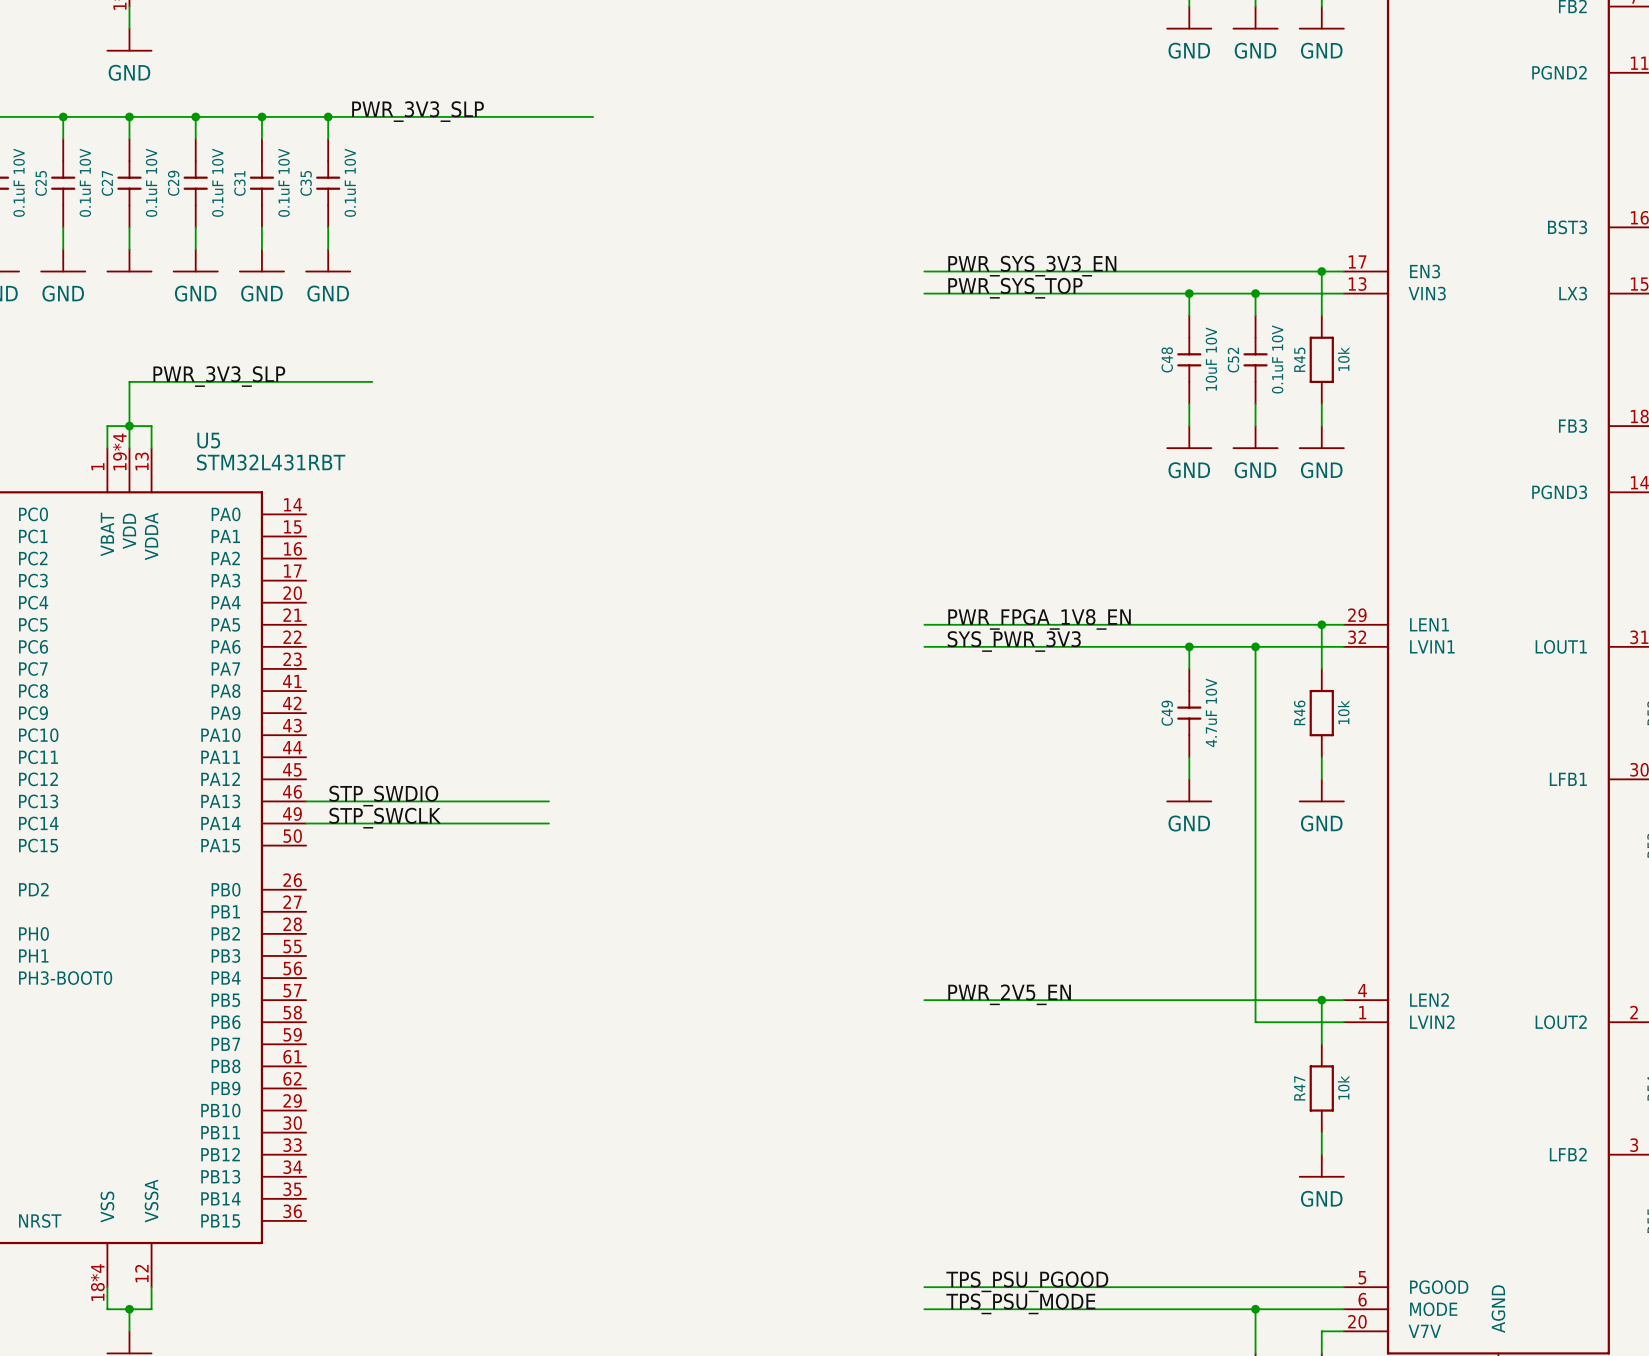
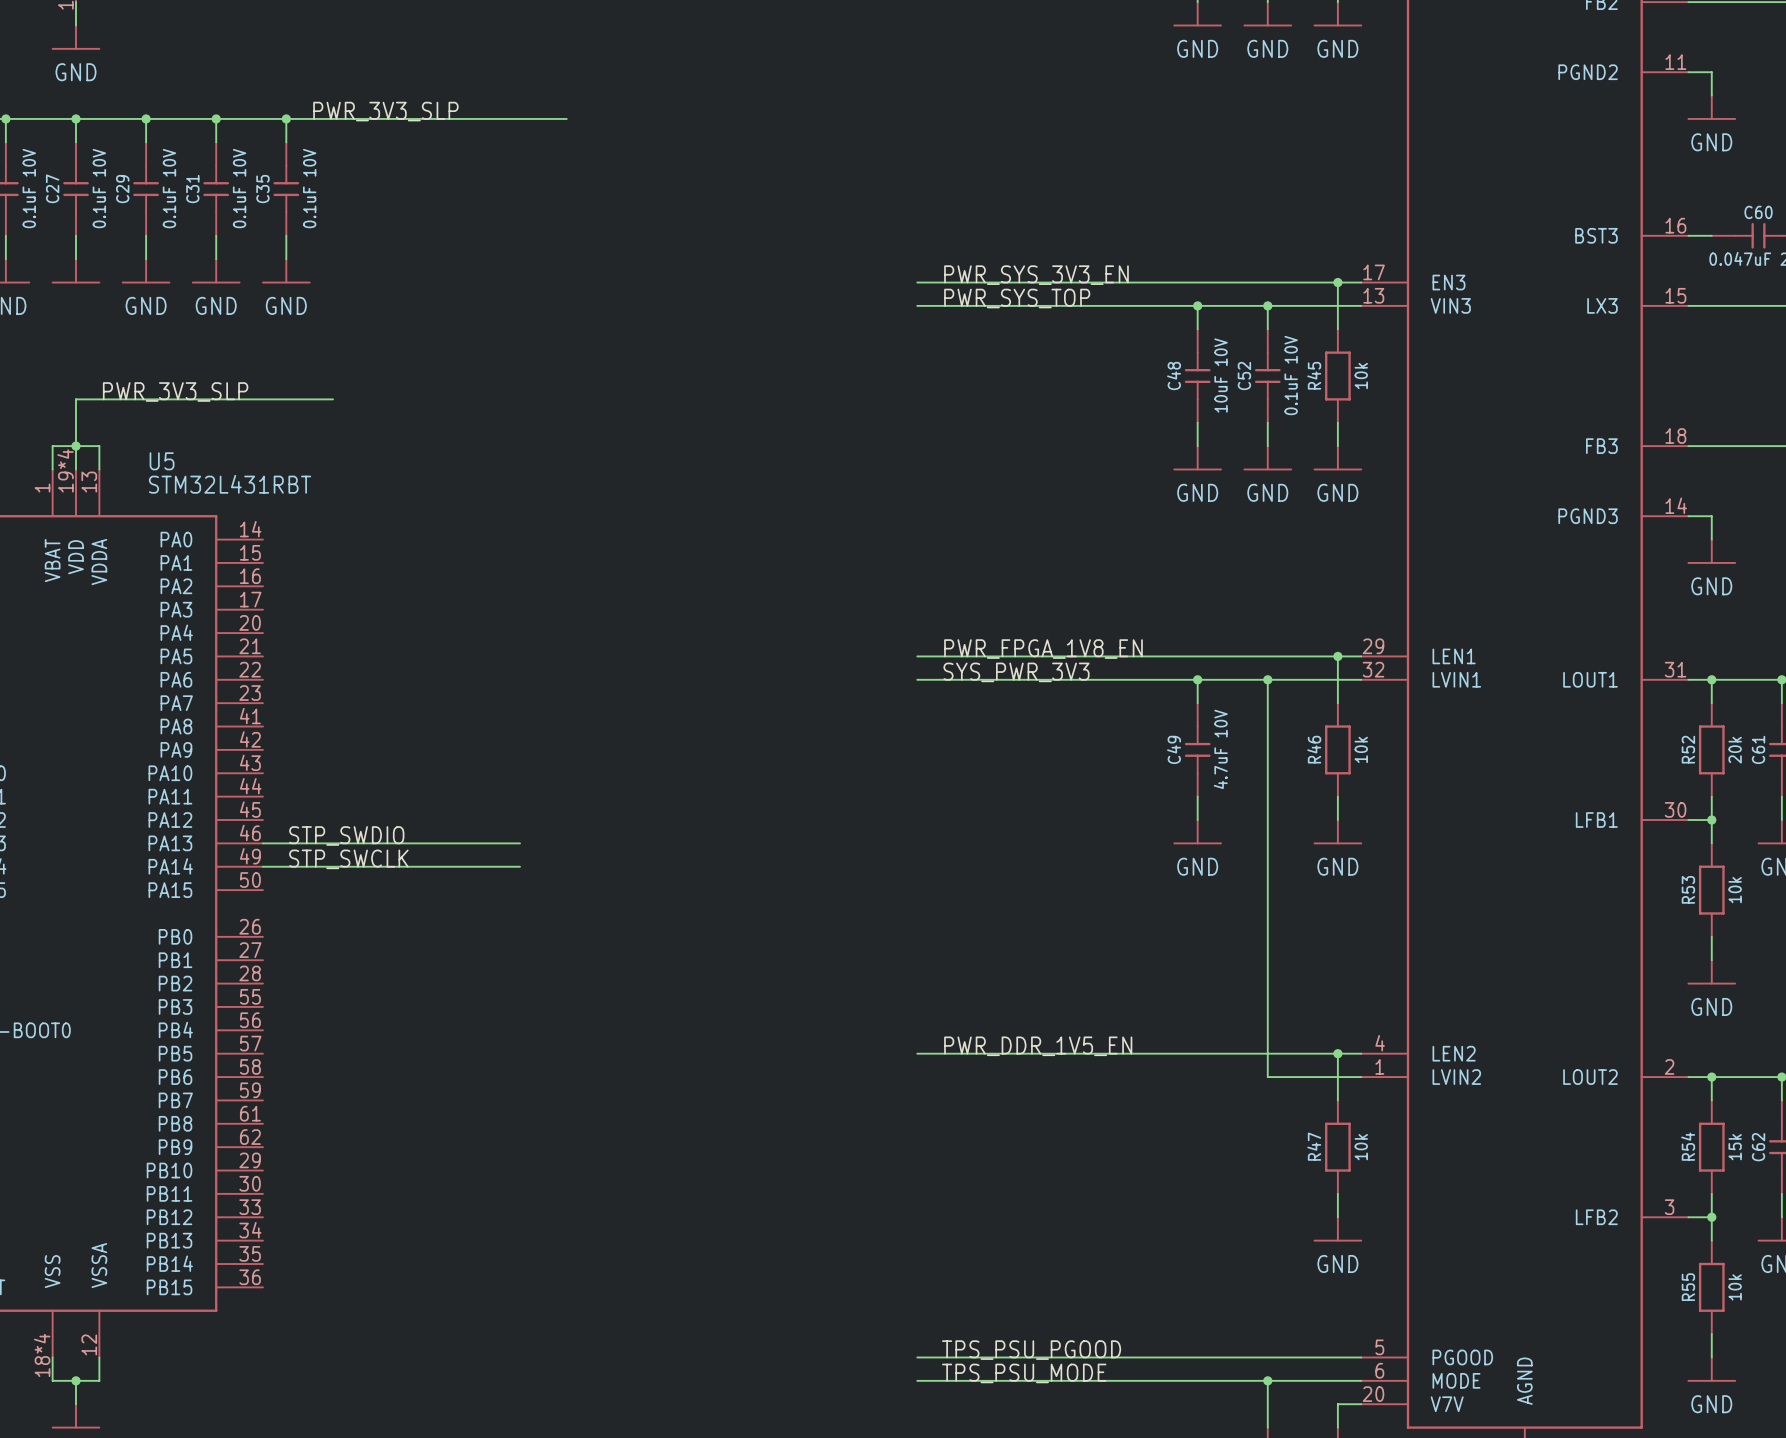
label: PWR_2V5_EN (1009, 994) -> PWR_DDR_1V5_EN (1038, 1046)

